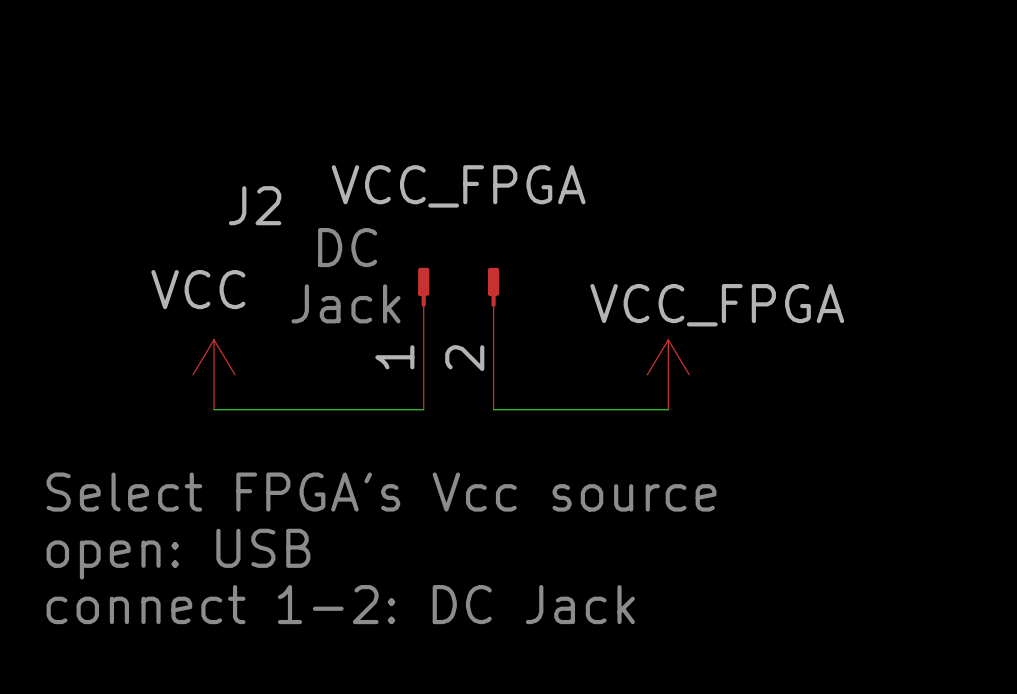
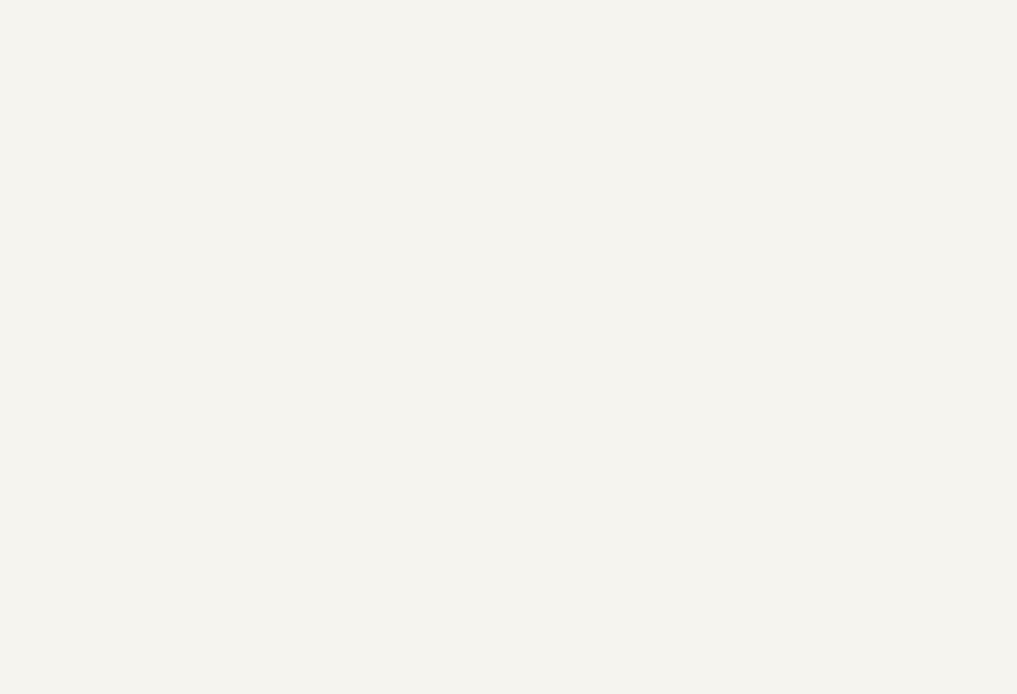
text: DC (347, 247) -> none
text: Jack (345, 303) -> none
J2: VCC_FPGA (458, 338) -> none
power symbol: VCC (213, 374) -> none
power symbol: VCC_FPGA (668, 374) -> none
wire: (213, 409) (423, 409) -> none
wire: (493, 409) (668, 409) -> none
text: Select FPGA's Vcc source (381, 492) -> none
text: open: USB (178, 554) -> none
text: connect 1-2: DC Jack (340, 604) -> none

